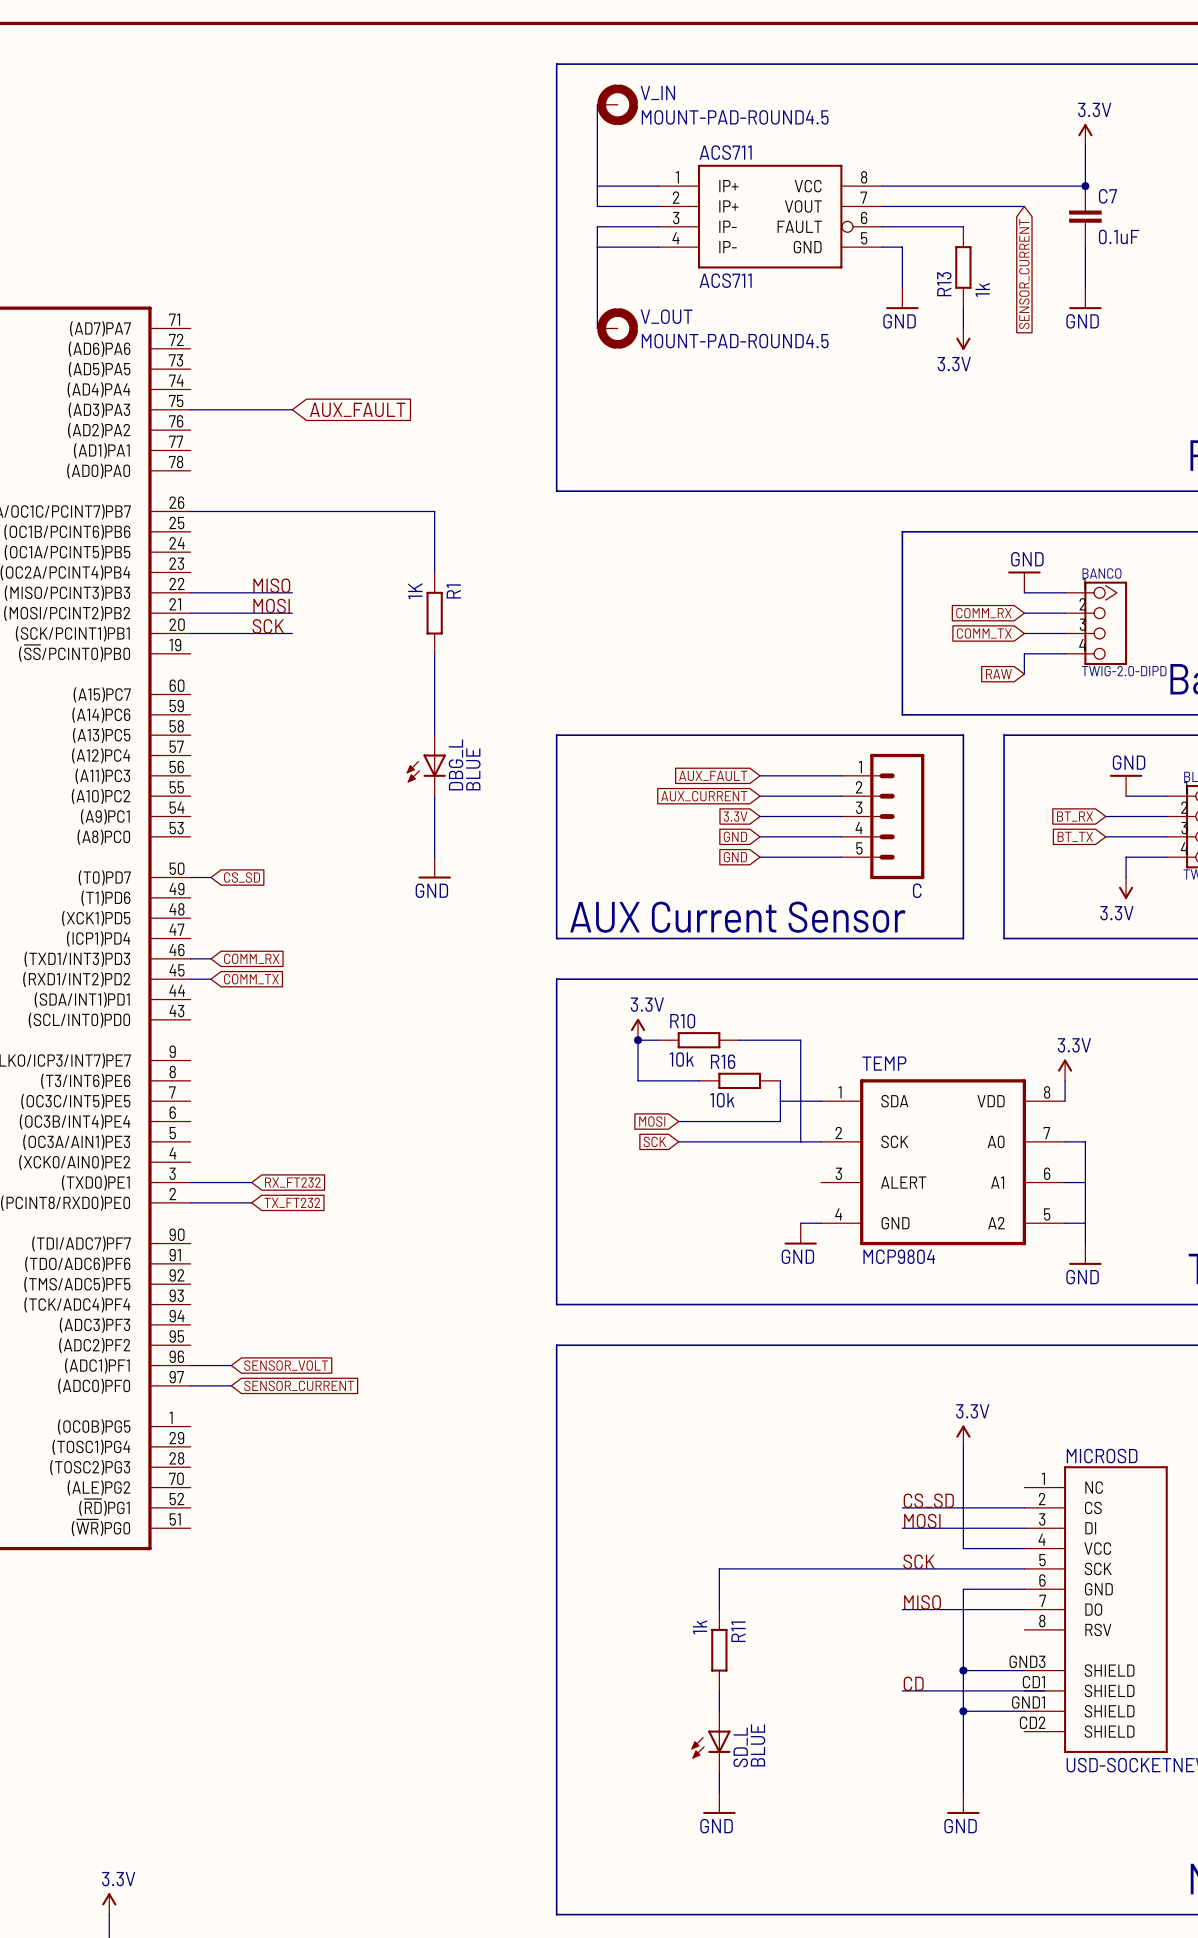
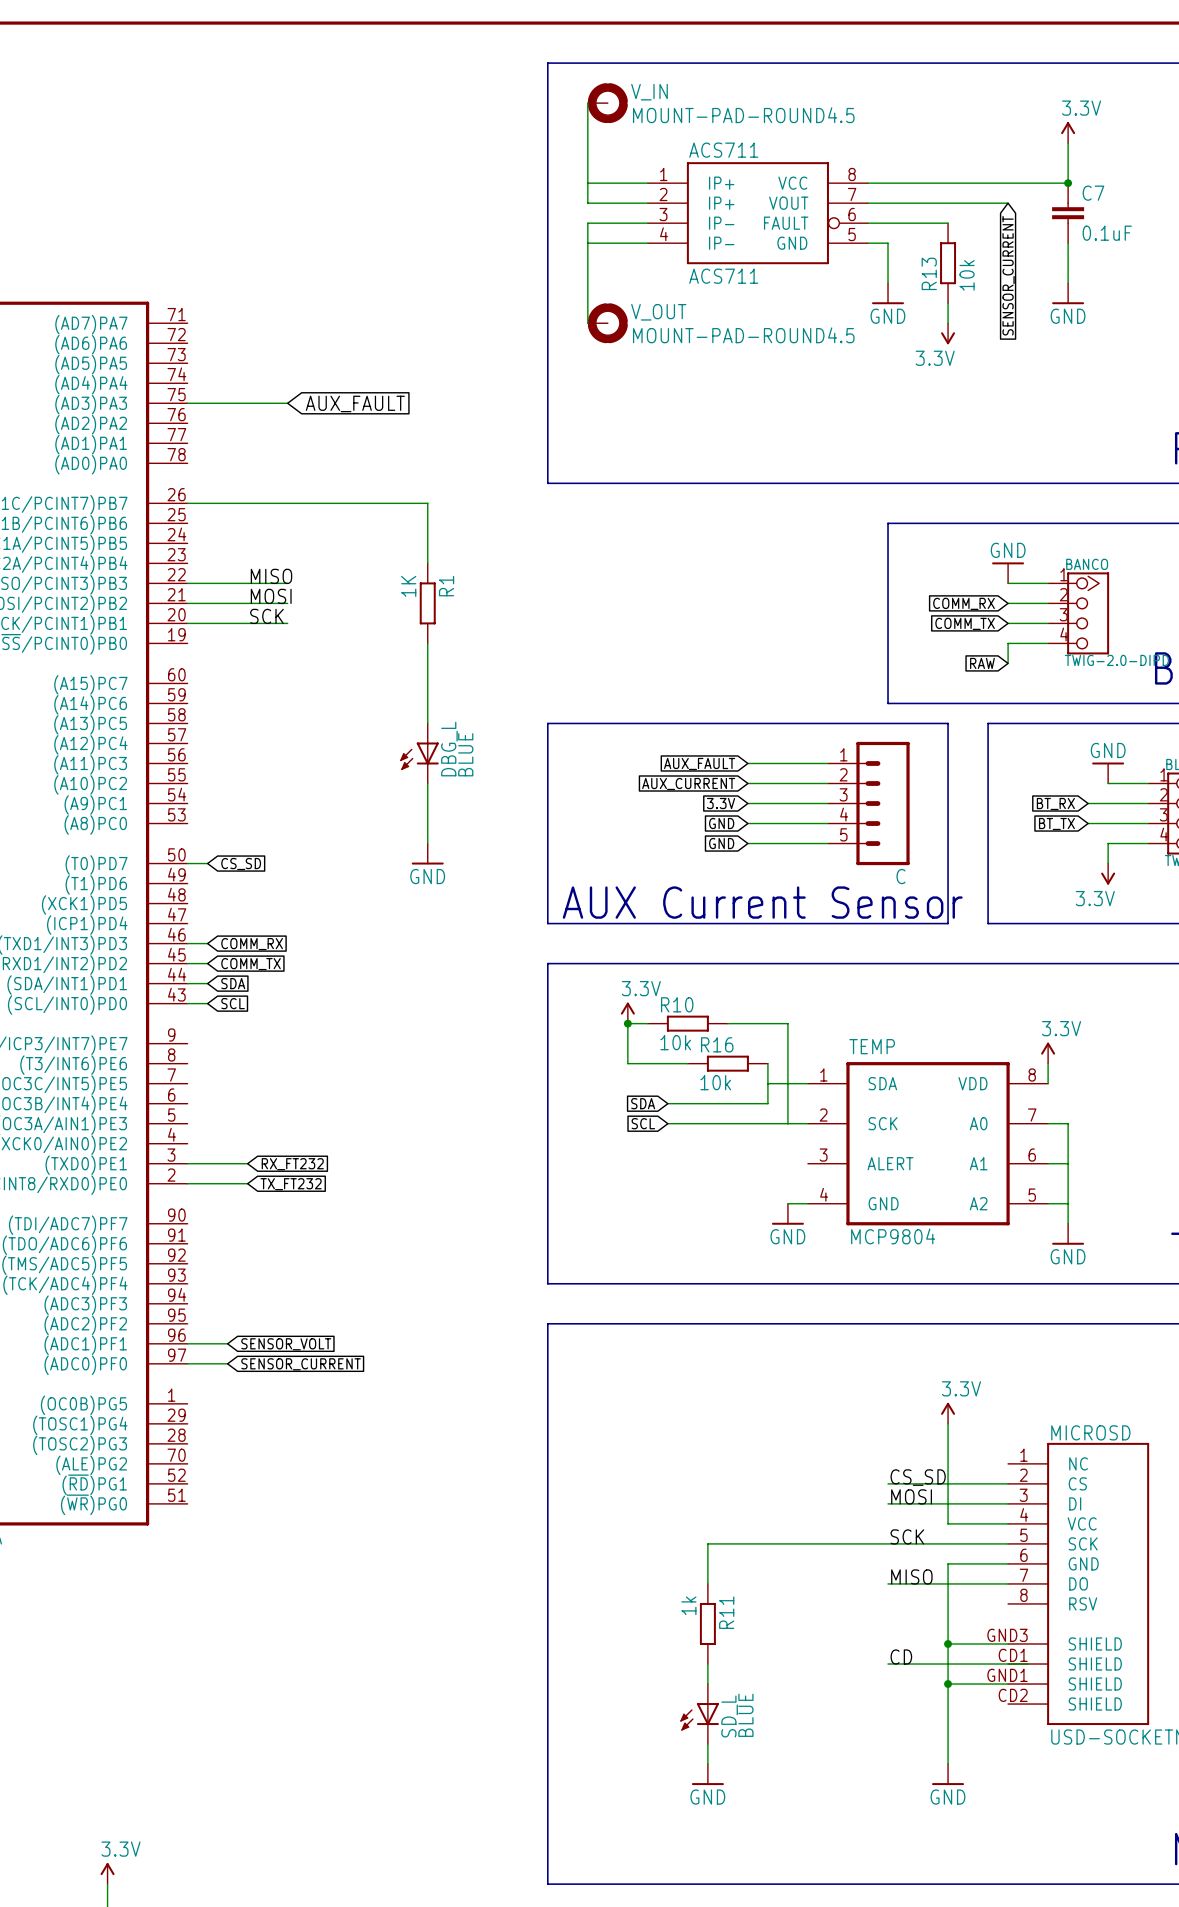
R13 value: 1k (982, 289) -> 10k (967, 275)
wire: none -> (187, 983) (207, 983)
global label: none -> SDA (233, 983)
wire: none -> (187, 1003) (207, 1003)
global label: none -> SCL (233, 1003)
global label: MOSI (652, 1121) -> SDA (643, 1103)
global label: SCK (654, 1141) -> SCL (643, 1123)

